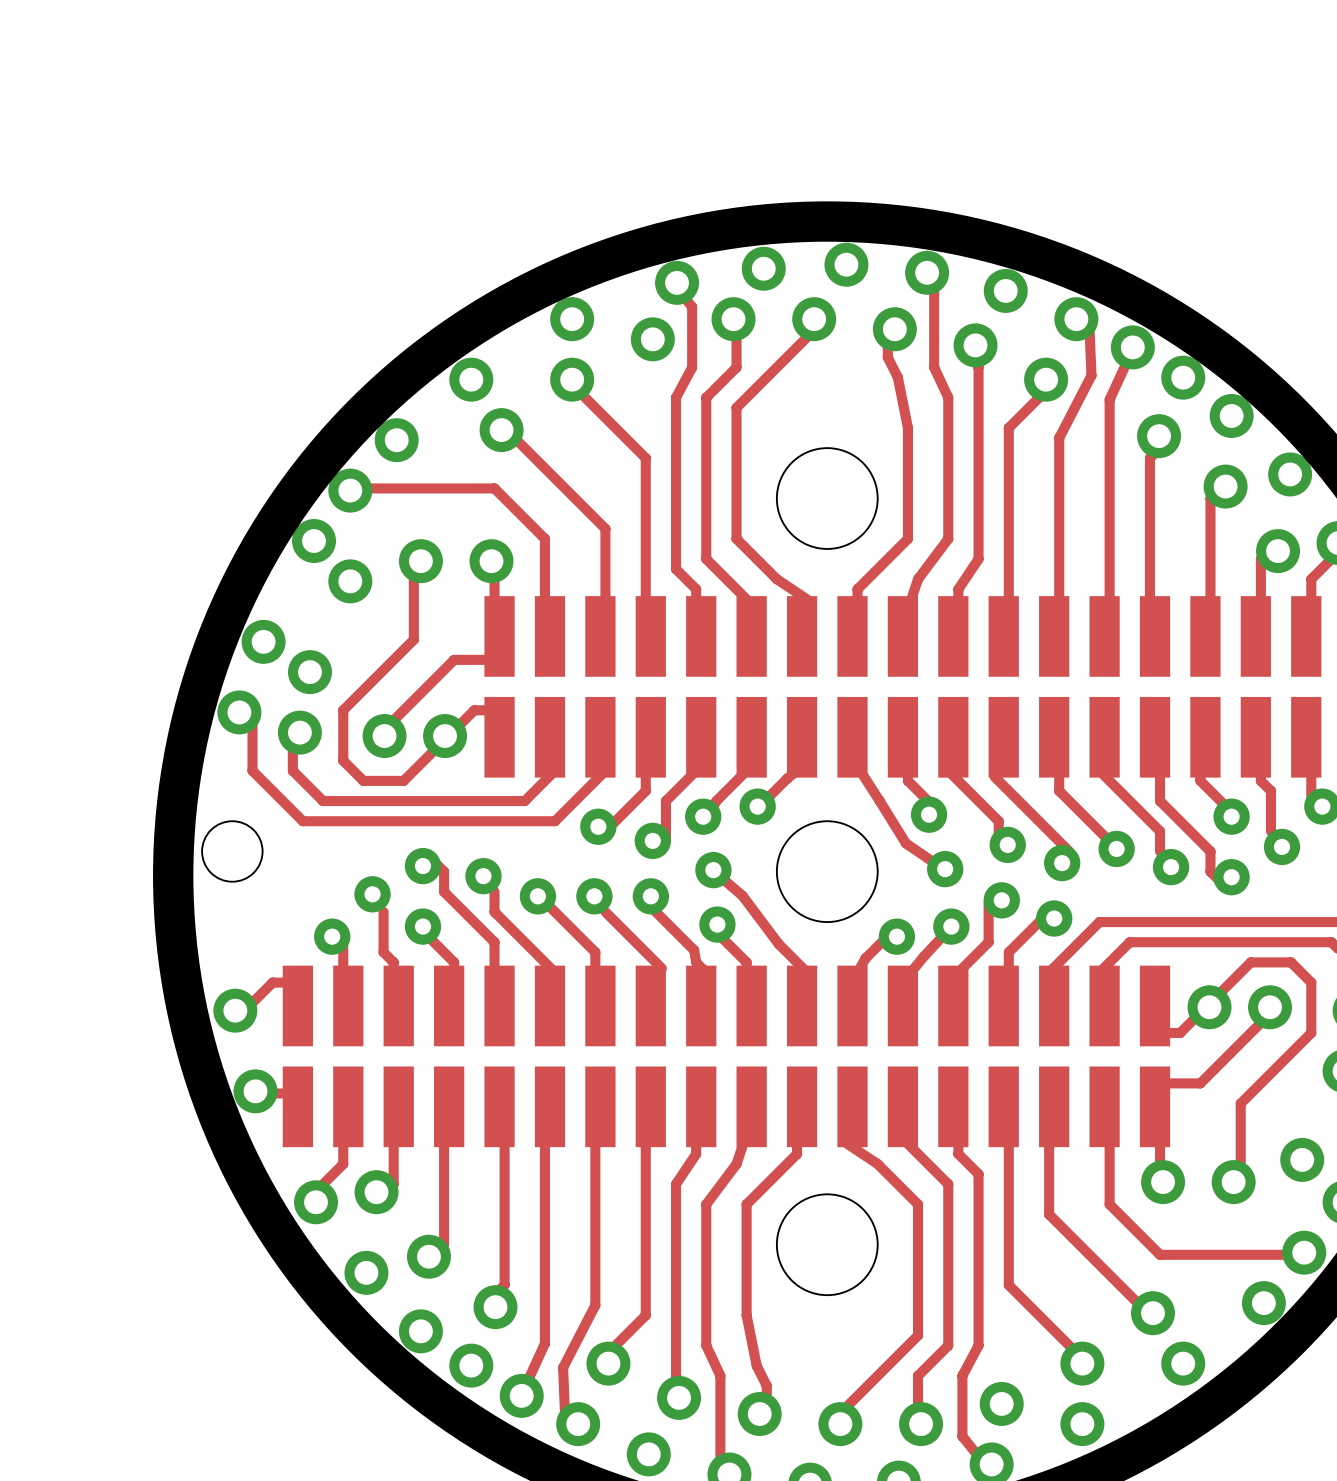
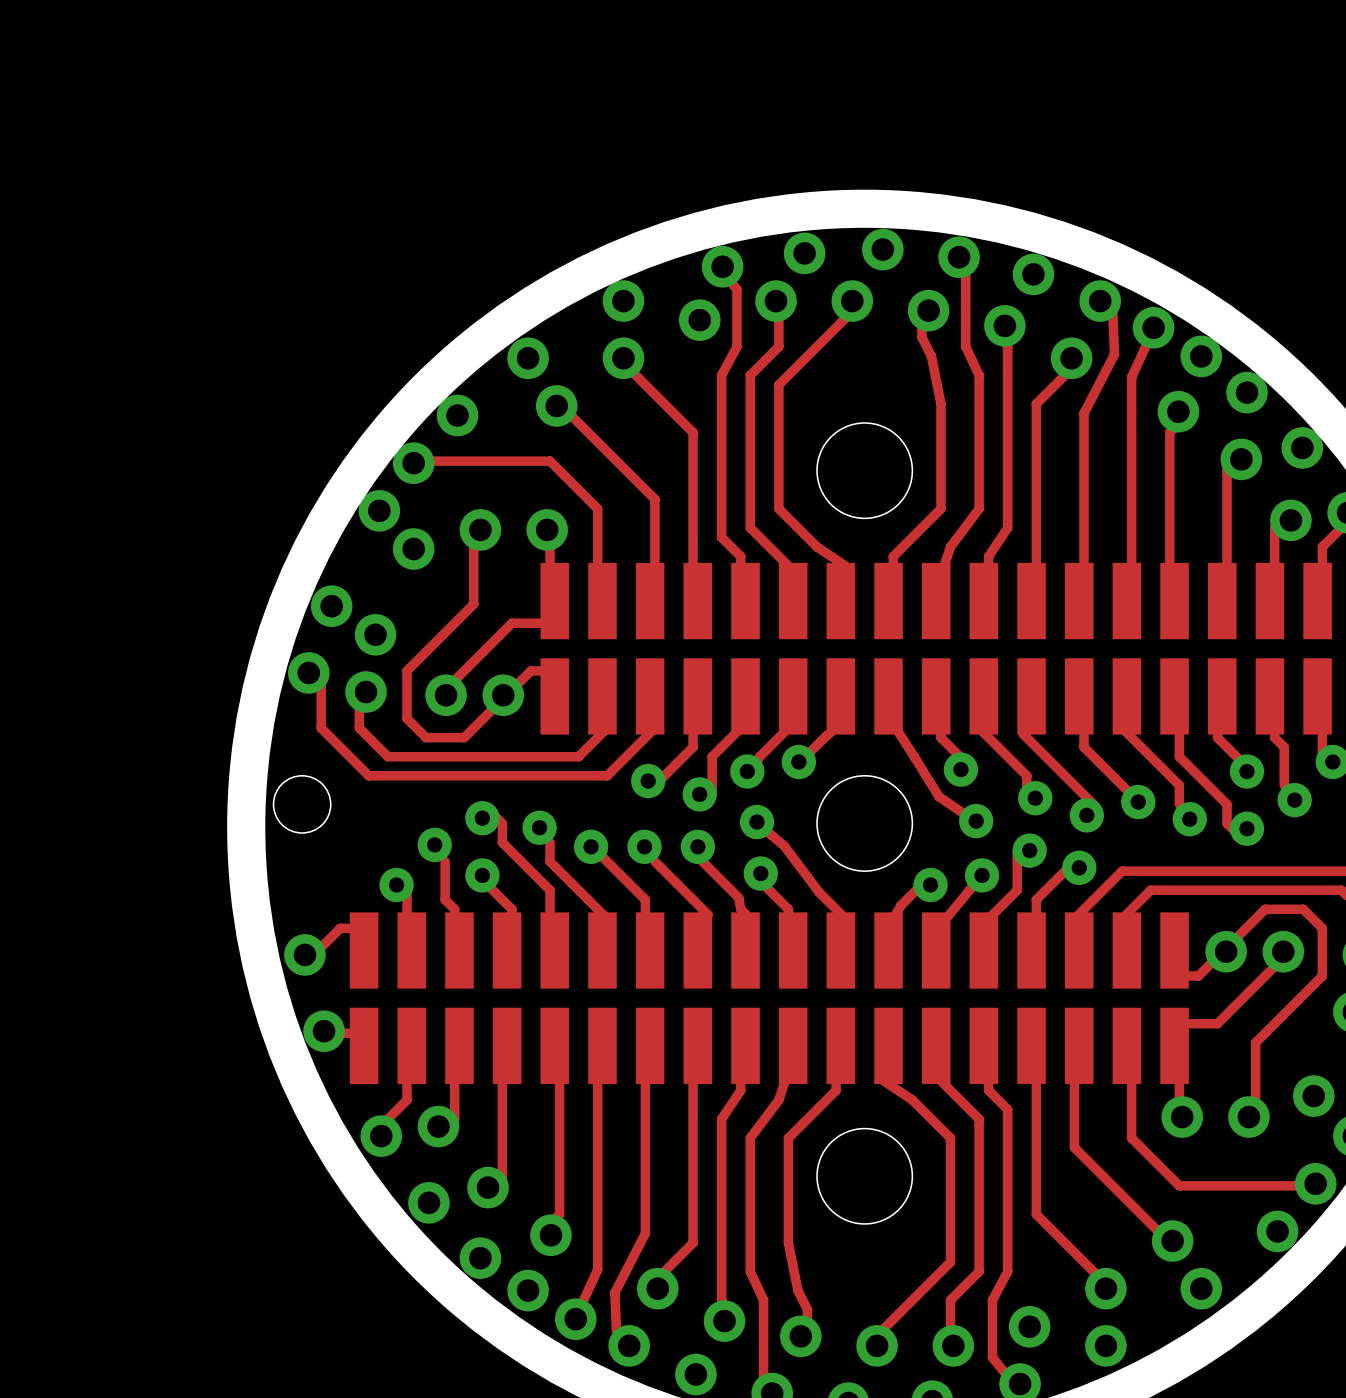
track: (950, 928) (895, 990) -> (981, 876) (942, 922)

